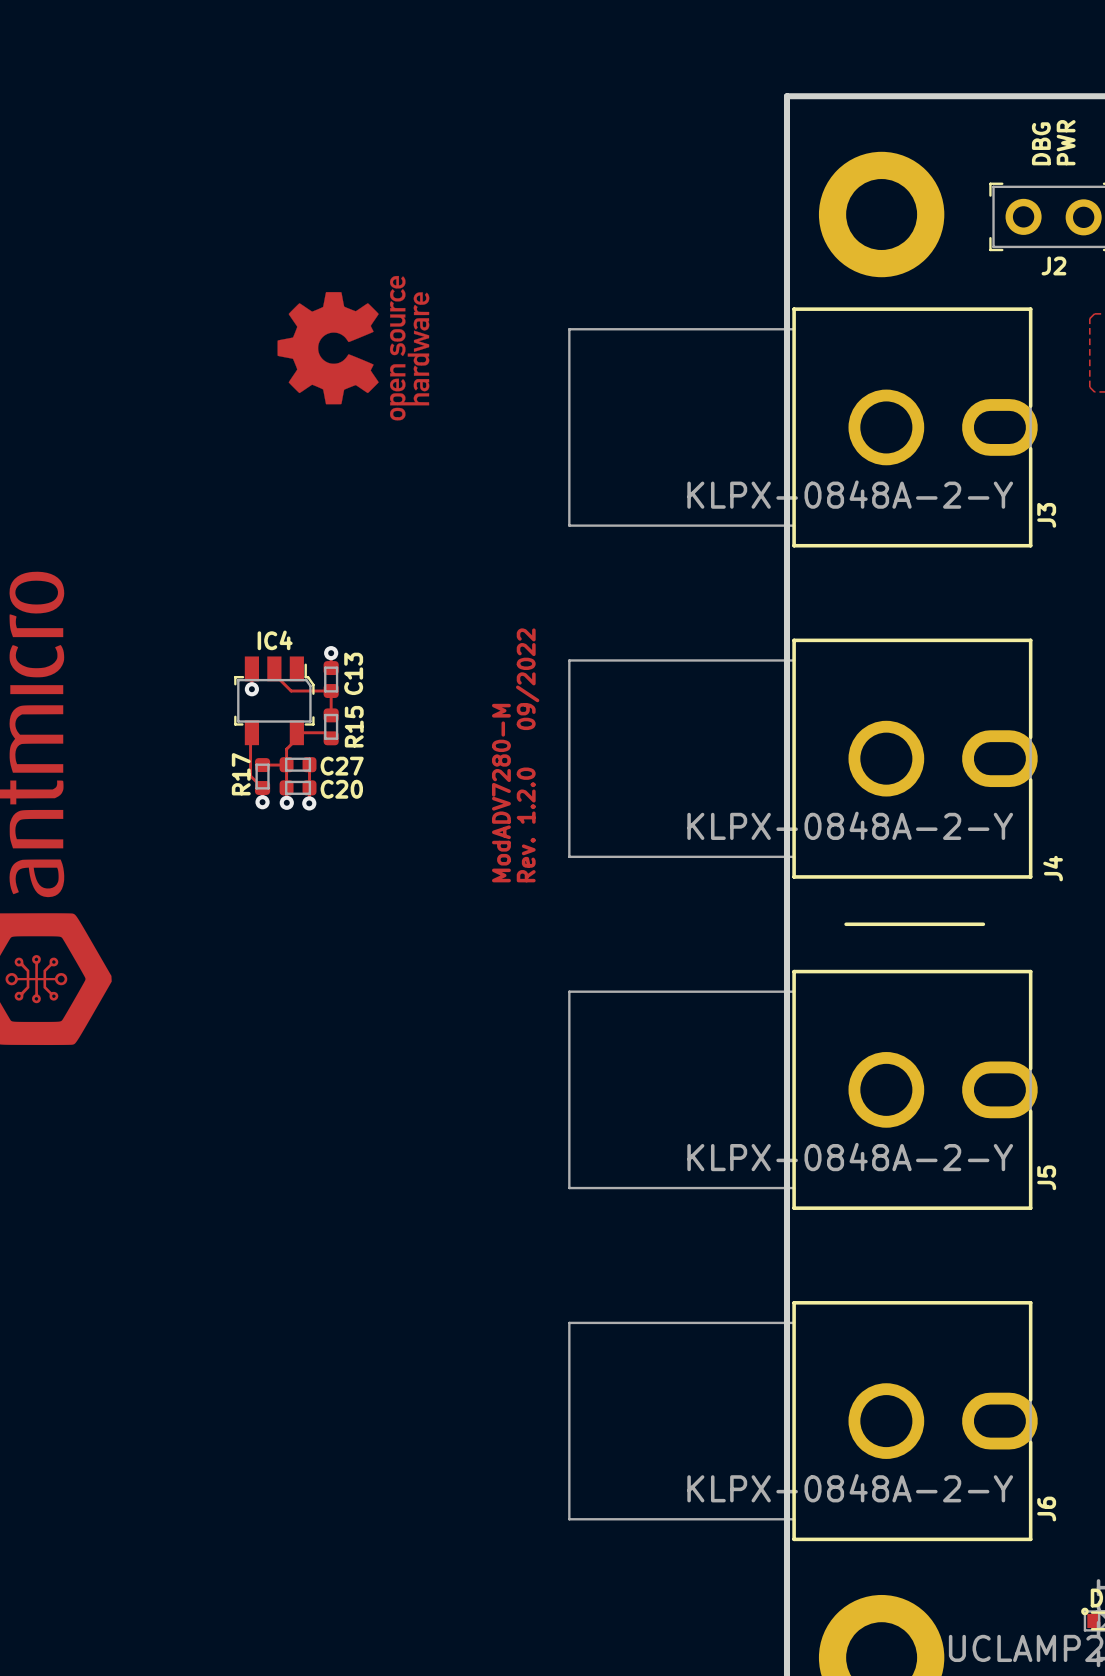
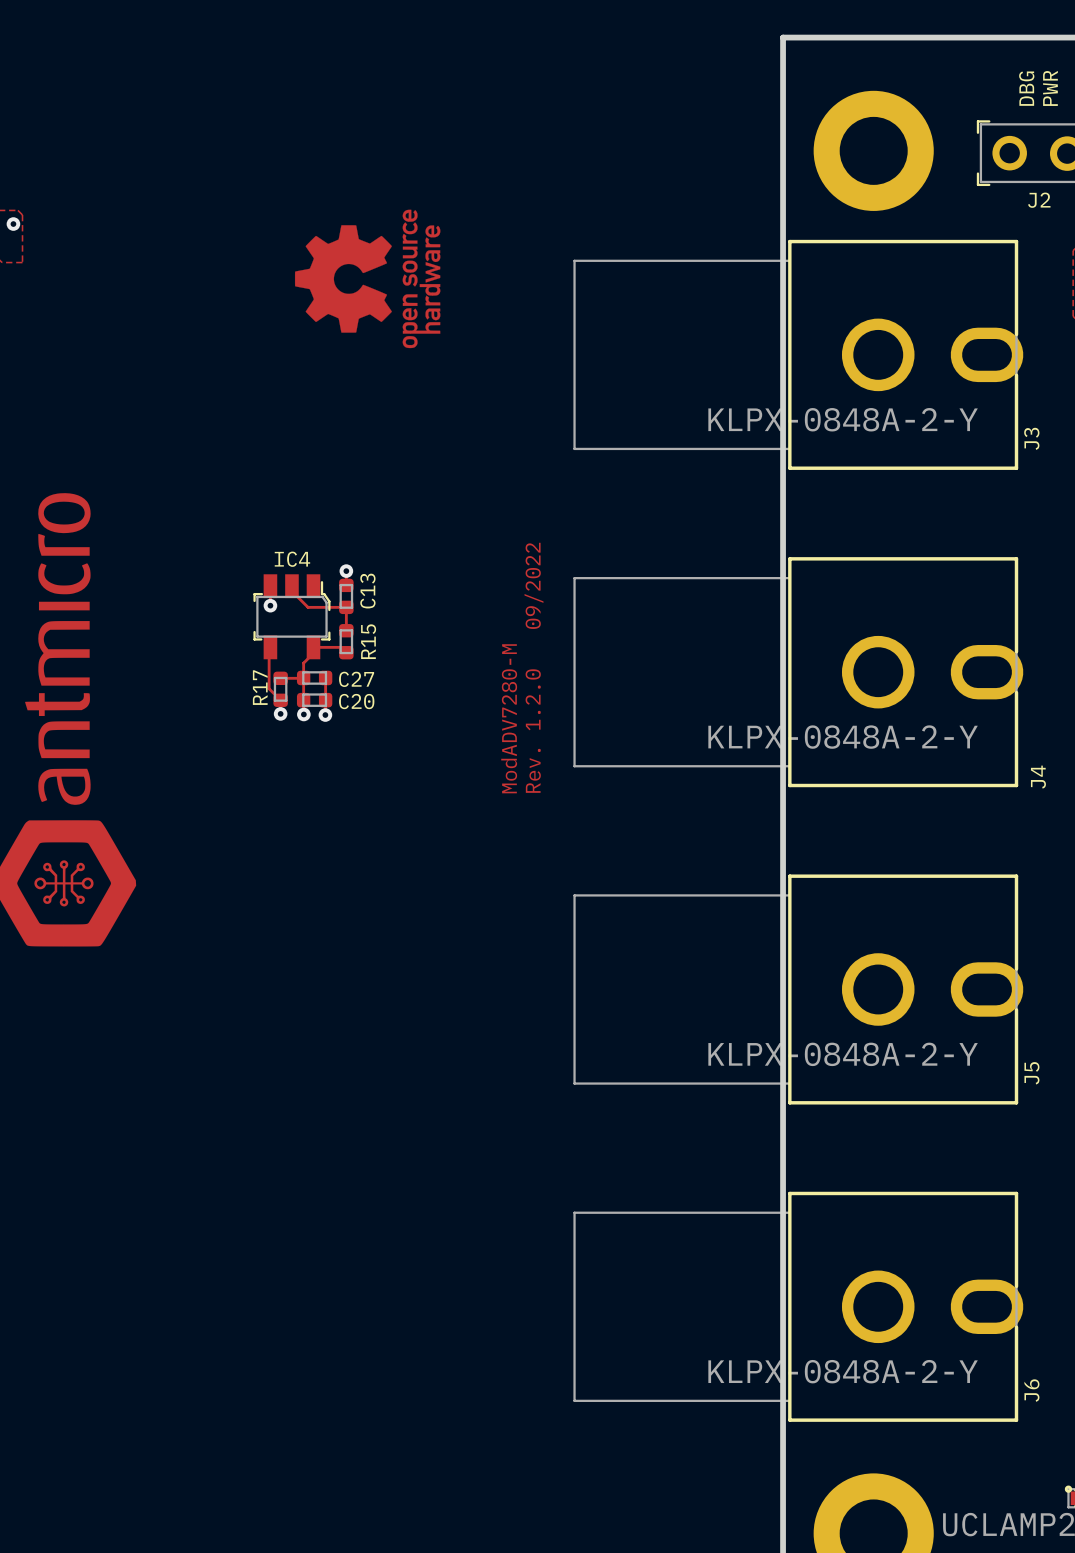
line: (846, 924) (983, 924) -> none

